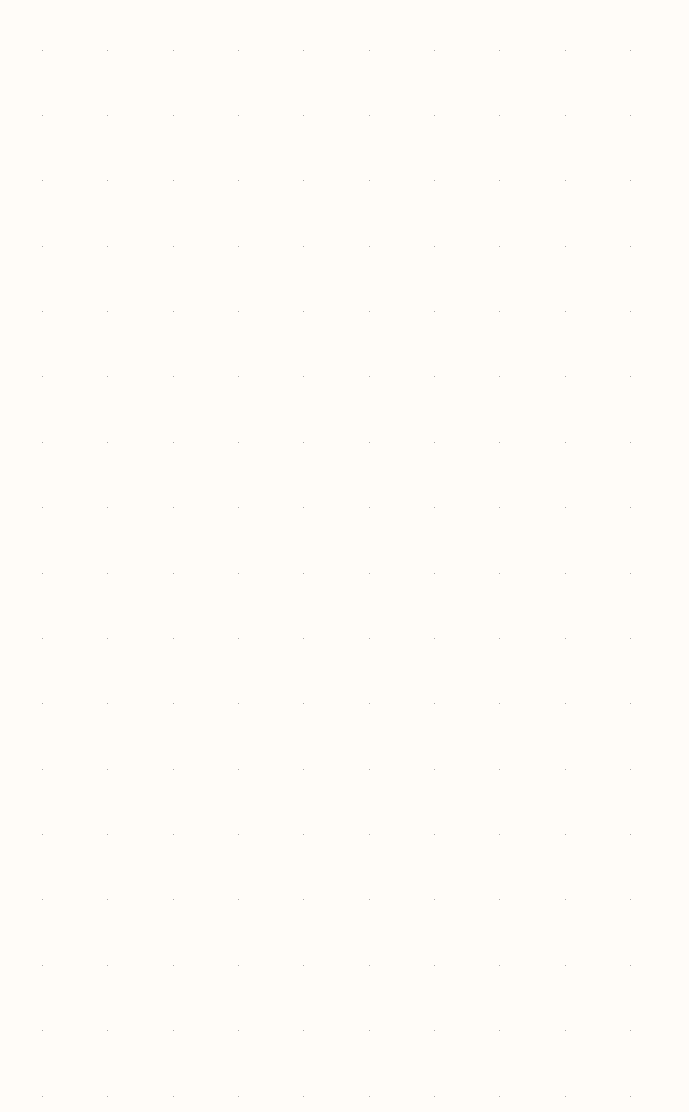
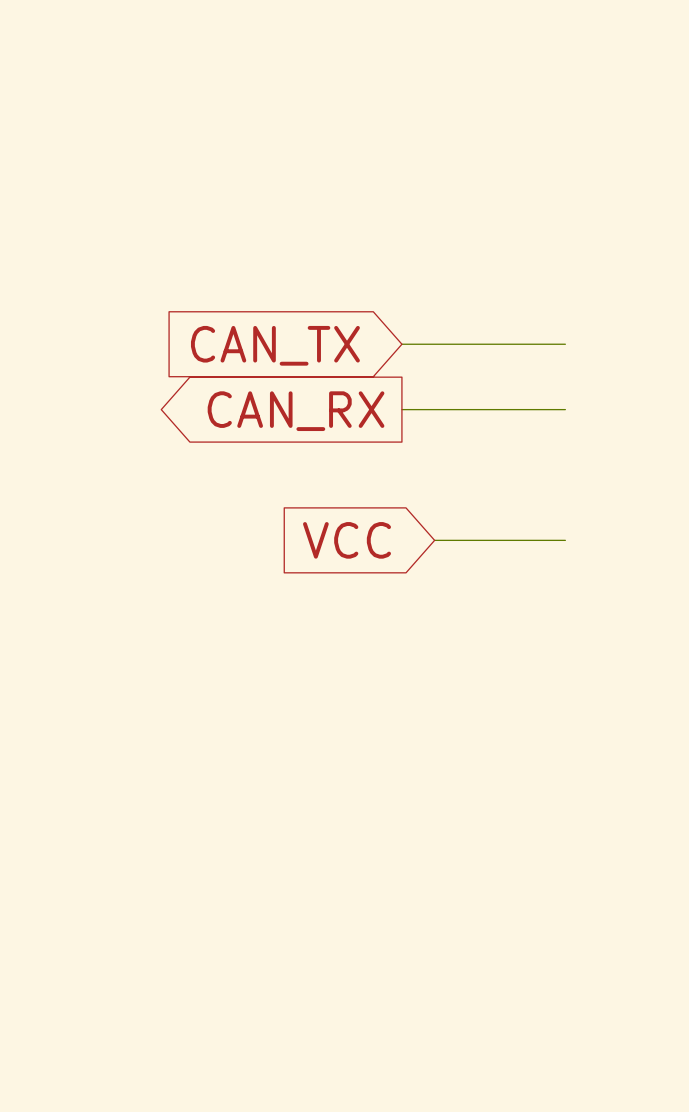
wire: none -> (401, 344) (565, 344)
global label: none -> CAN_TX (275, 345)
wire: none -> (401, 409) (565, 409)
global label: none -> CAN_RX (296, 411)
global label: none -> VCC (347, 540)
wire: none -> (434, 540) (565, 540)

